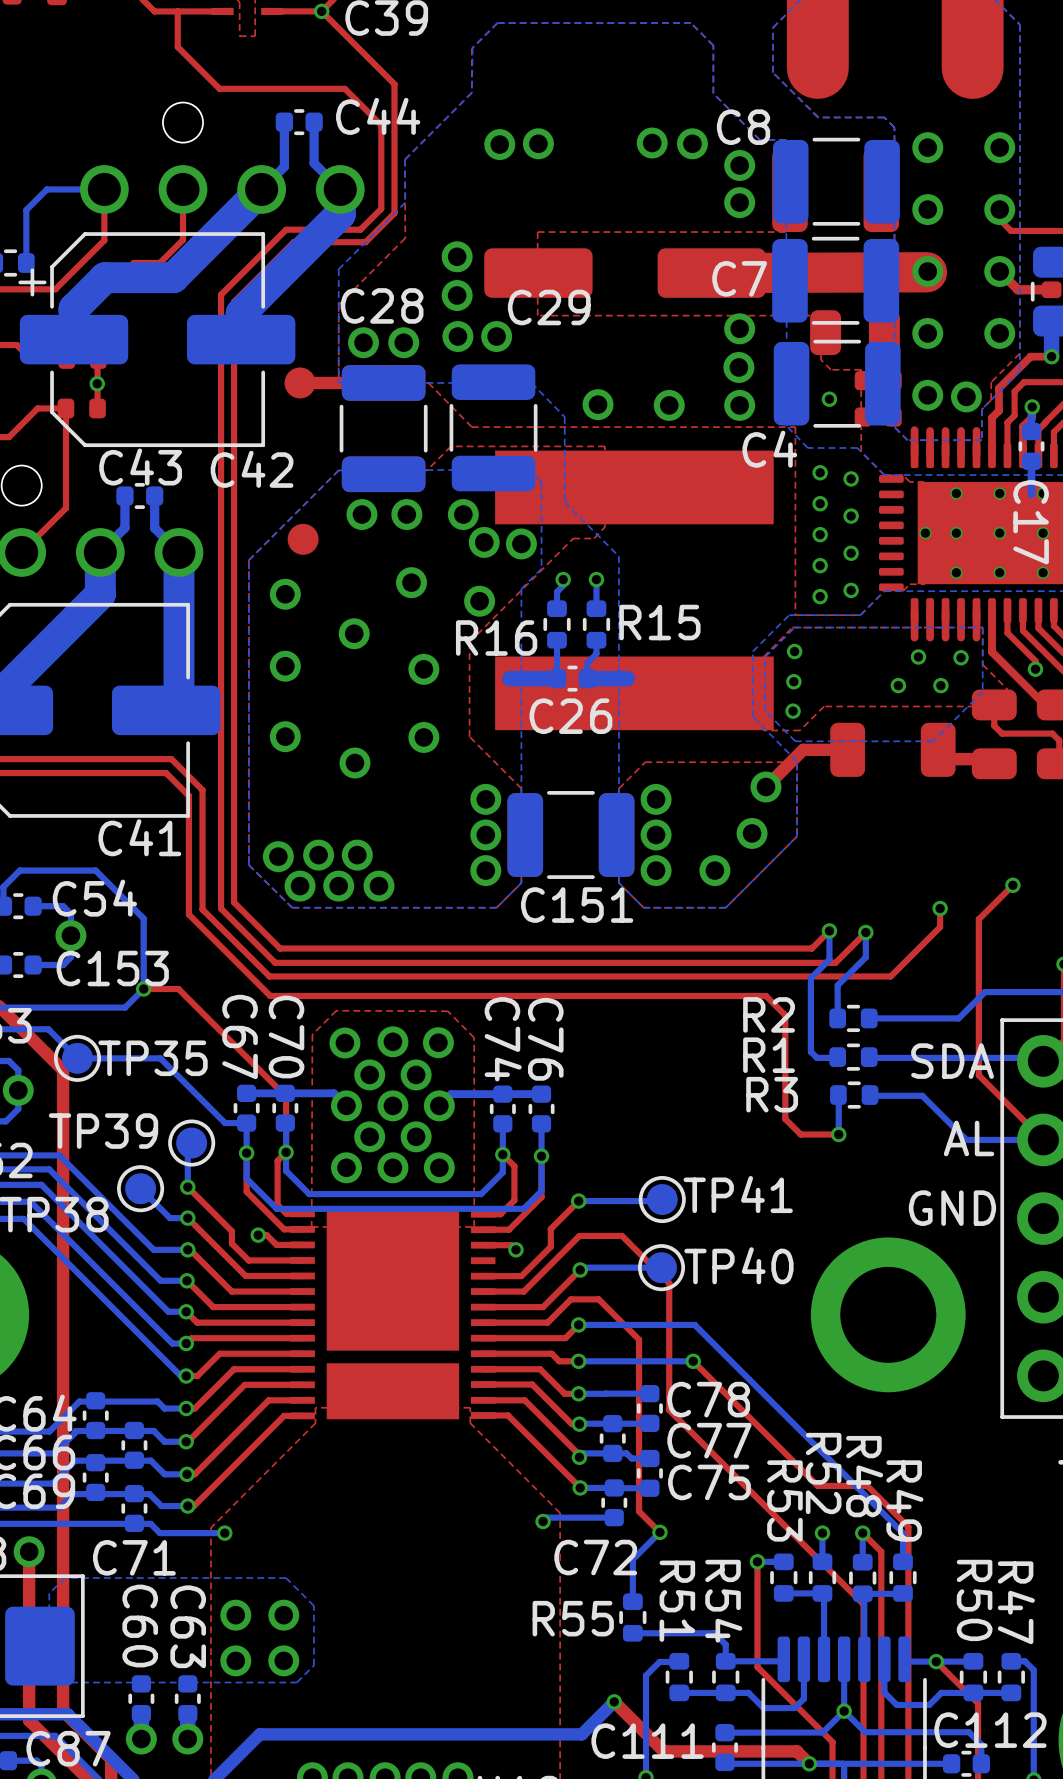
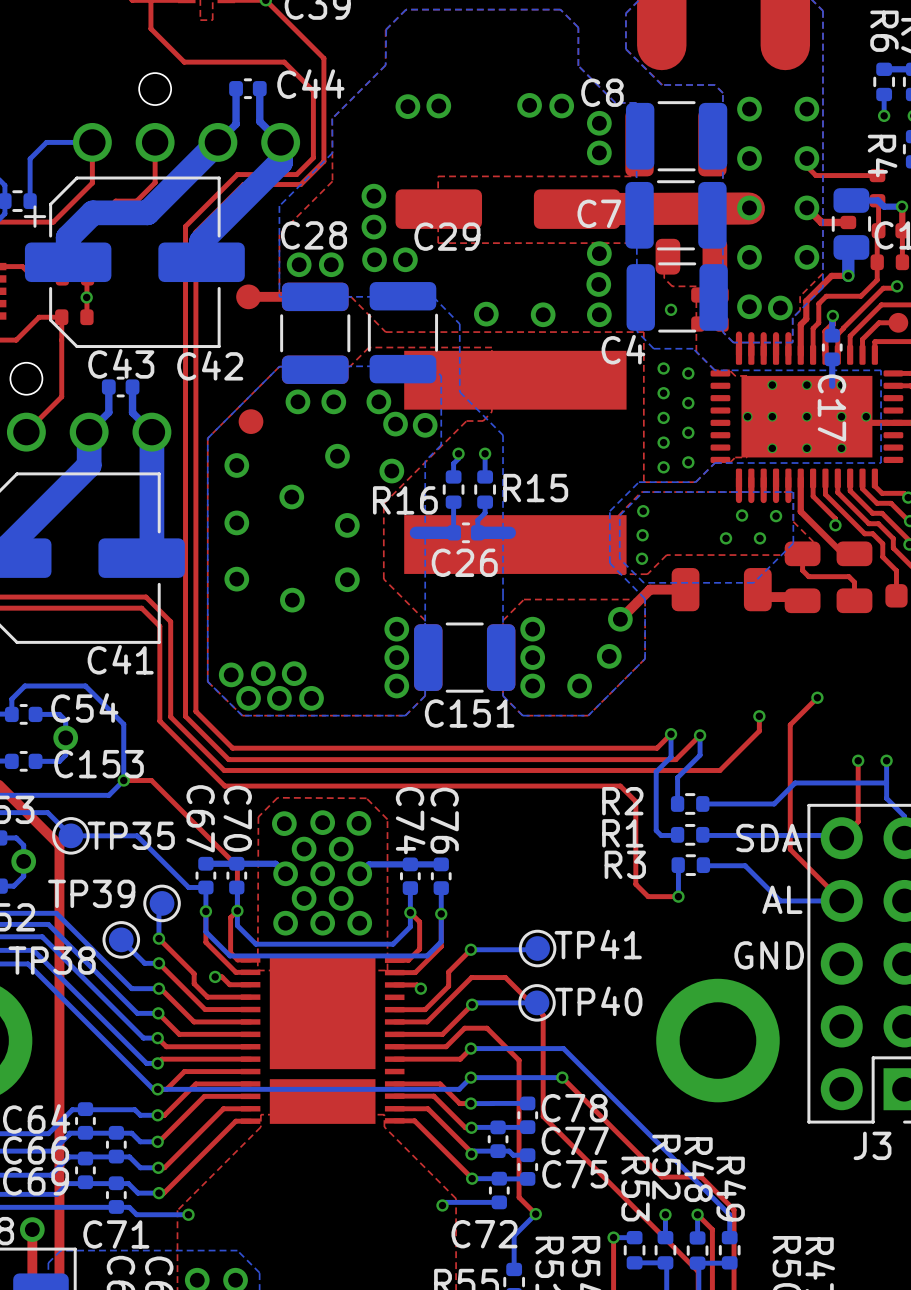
top track: (483, 1353) (551, 1353) (559, 1361) (578, 1361) -> none
bottom track: none -> (470, 1077) (459, 1089) (157, 1089)

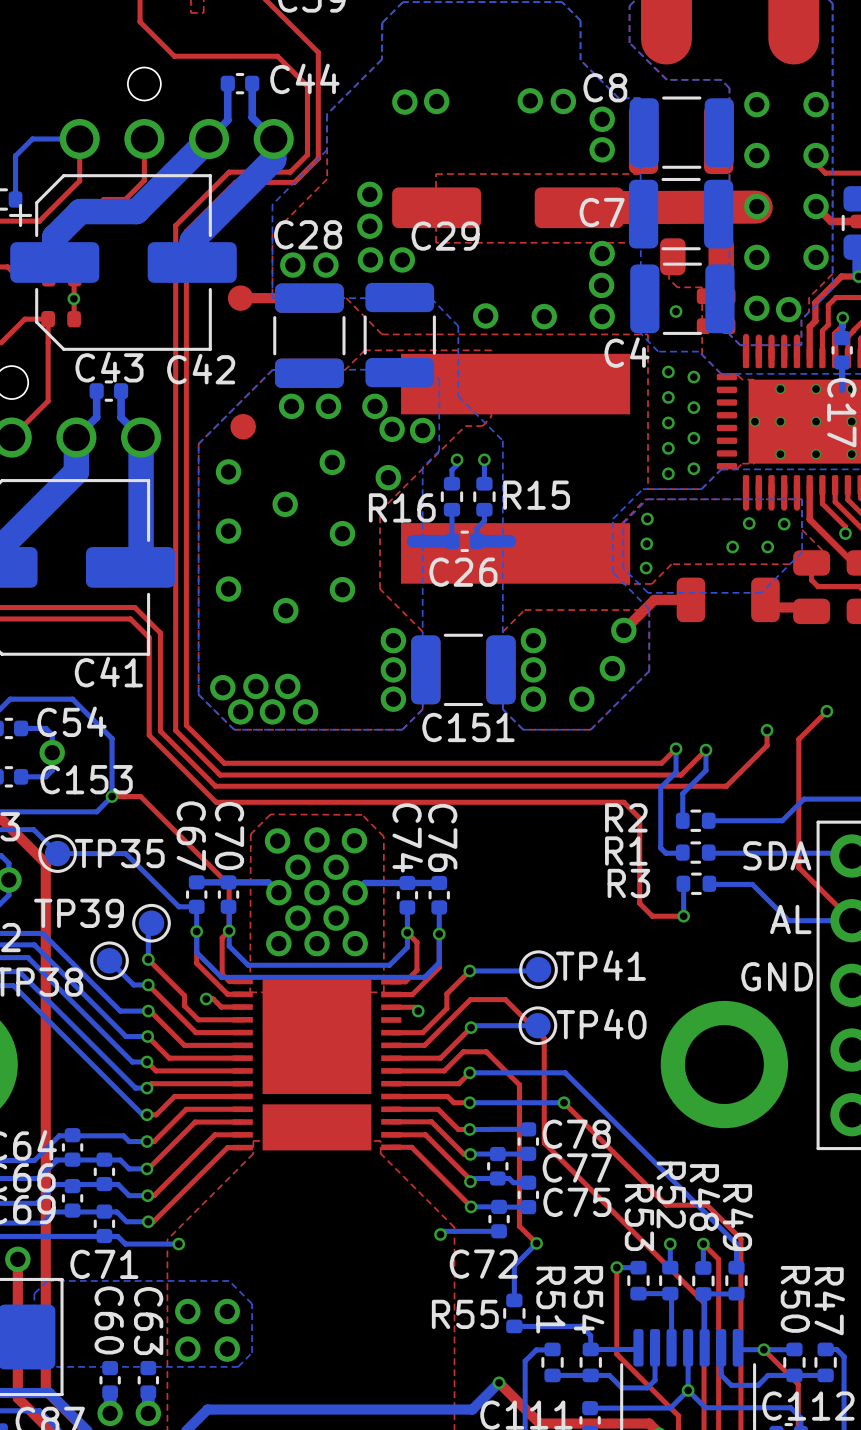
top track: none -> (391, 1096) (447, 1096) (453, 1102) (469, 1102)
bottom track: (470, 1077) (459, 1089) (157, 1089) -> none

